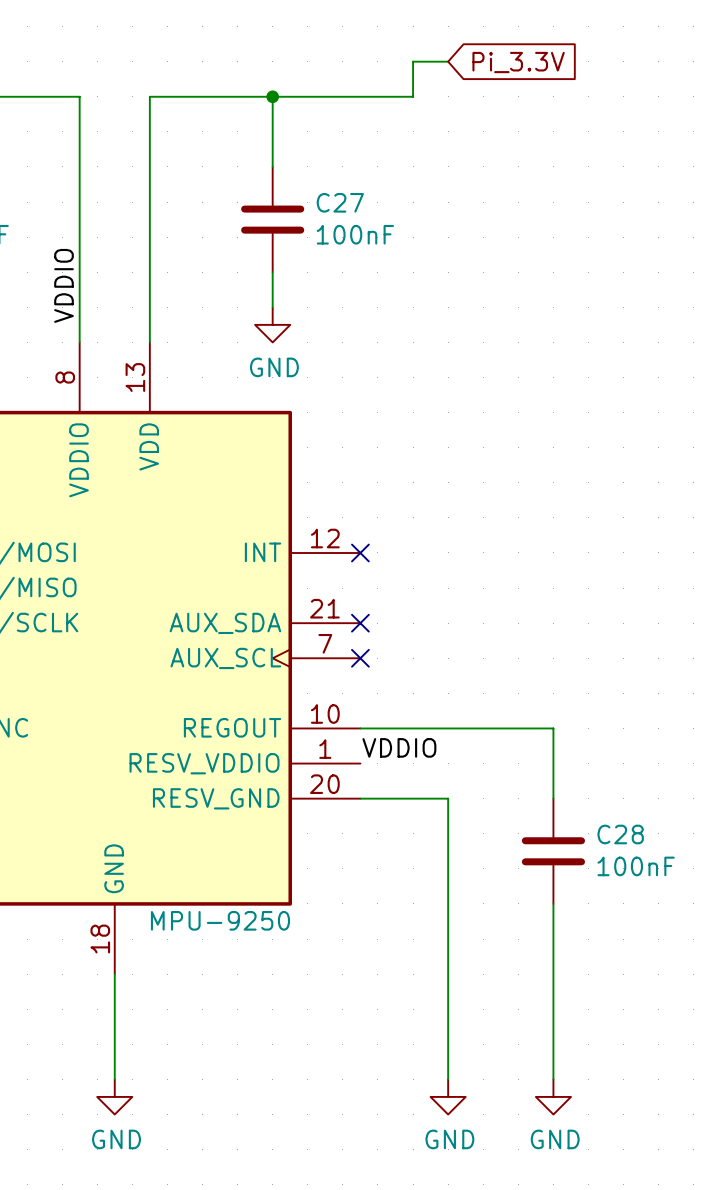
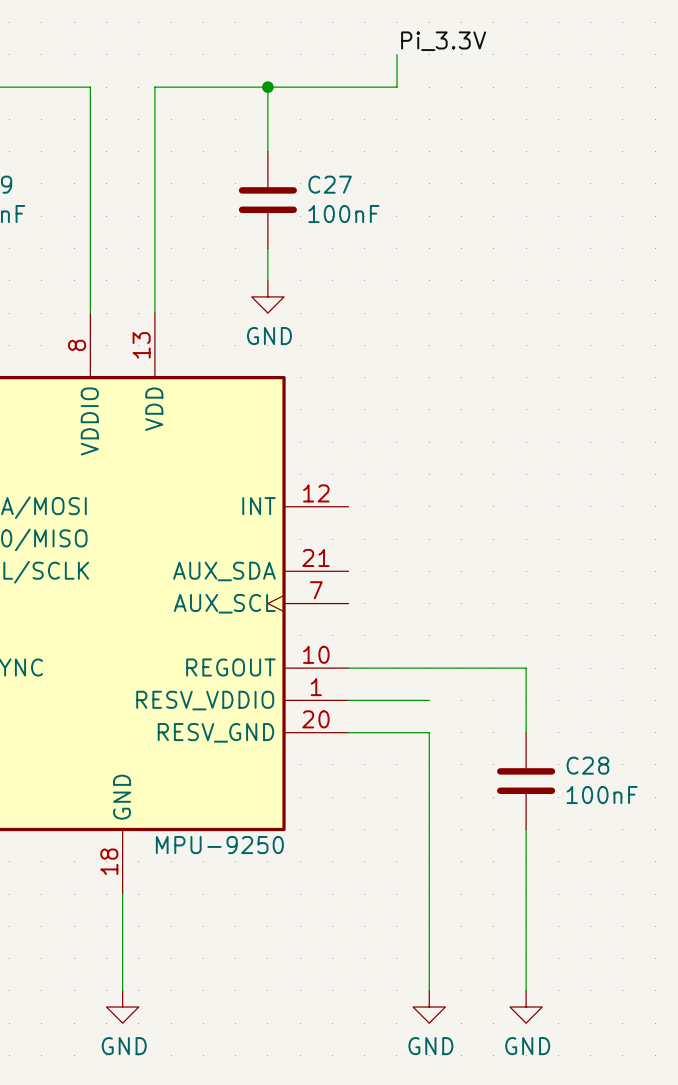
label: none -> Pi_3.3V (443, 41)
wire: (413, 61) (448, 61) -> none
global label: Pi_3.3V (518, 62) -> none
label: VDDIO (64, 285) -> none
no-connect mark: (360, 552) -> none
no-connect mark: (360, 623) -> none
no-connect mark: (360, 658) -> none
label: VDDIO (399, 747) -> none
wire: none -> (348, 700) (429, 700)

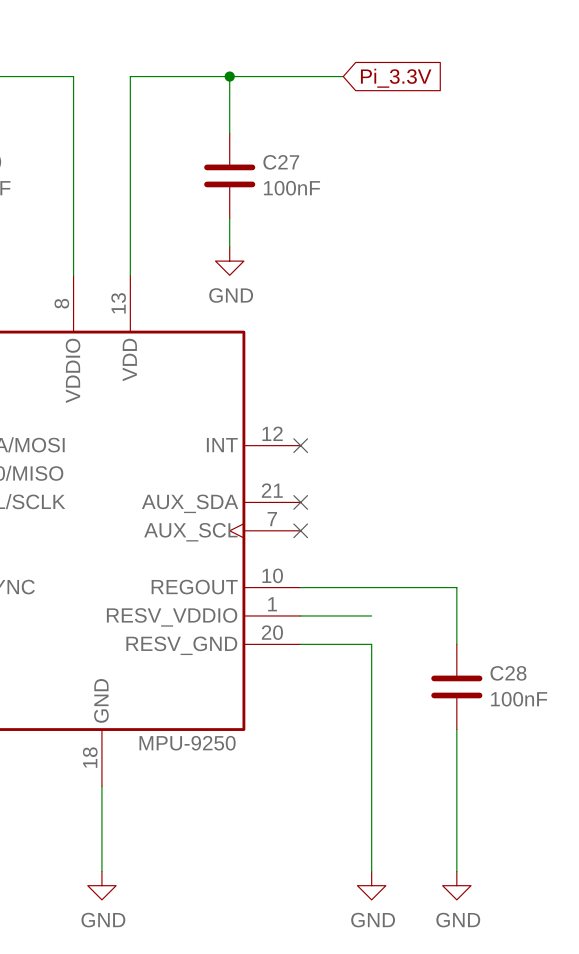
label: Pi_3.3V (443, 41) -> none
wire: (396, 54) (396, 87) -> none
global label: none -> Pi_3.3V (396, 78)
no-connect mark: none -> (300, 445)
no-connect mark: none -> (300, 502)
no-connect mark: none -> (300, 530)

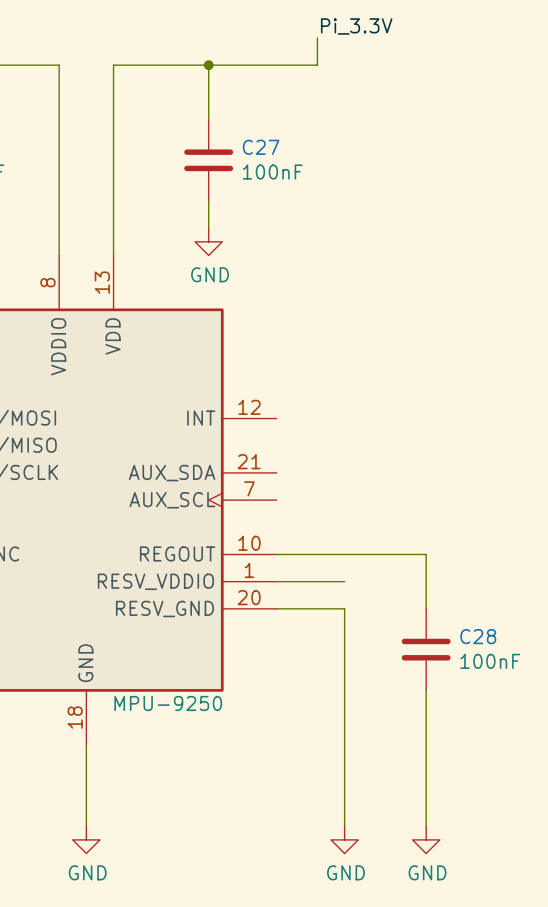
label: none -> Pi_3.3V (356, 26)
wire: none -> (317, 37) (317, 65)
global label: Pi_3.3V (396, 78) -> none
no-connect mark: (300, 445) -> none
no-connect mark: (300, 502) -> none
no-connect mark: (300, 530) -> none

